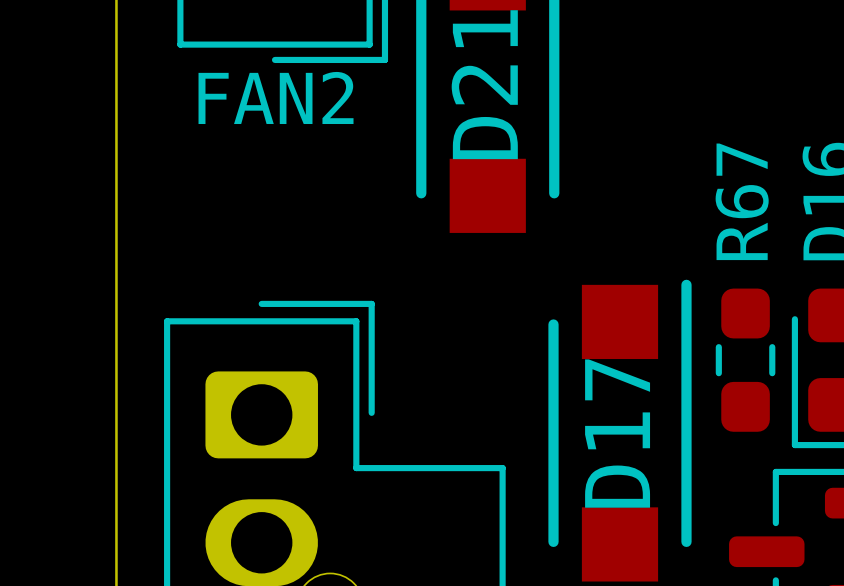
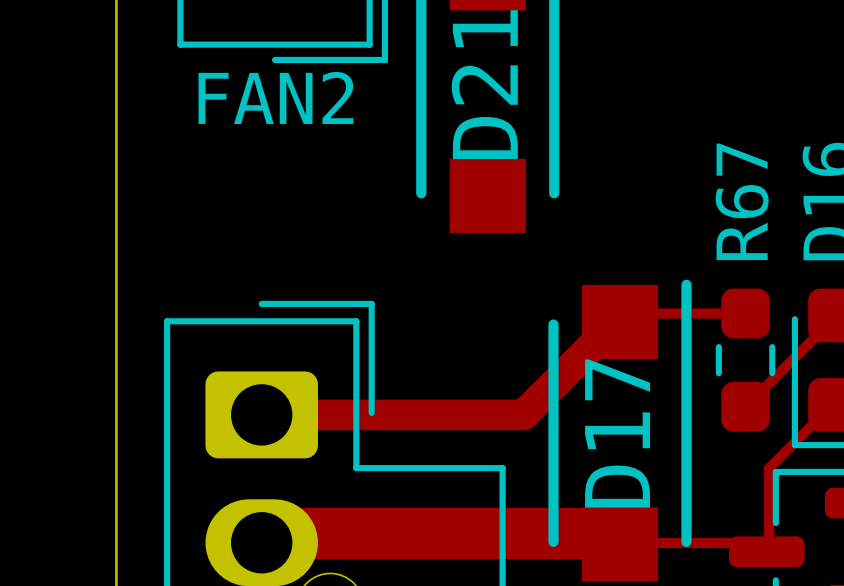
track: none -> (745, 313) (624, 313) (523, 414) (261, 414)
track: none -> (832, 315) (832, 319) (745, 406)
track: none -> (832, 404) (769, 468) (769, 549) (762, 543) (617, 543) (608, 533) (270, 533) (261, 542)

